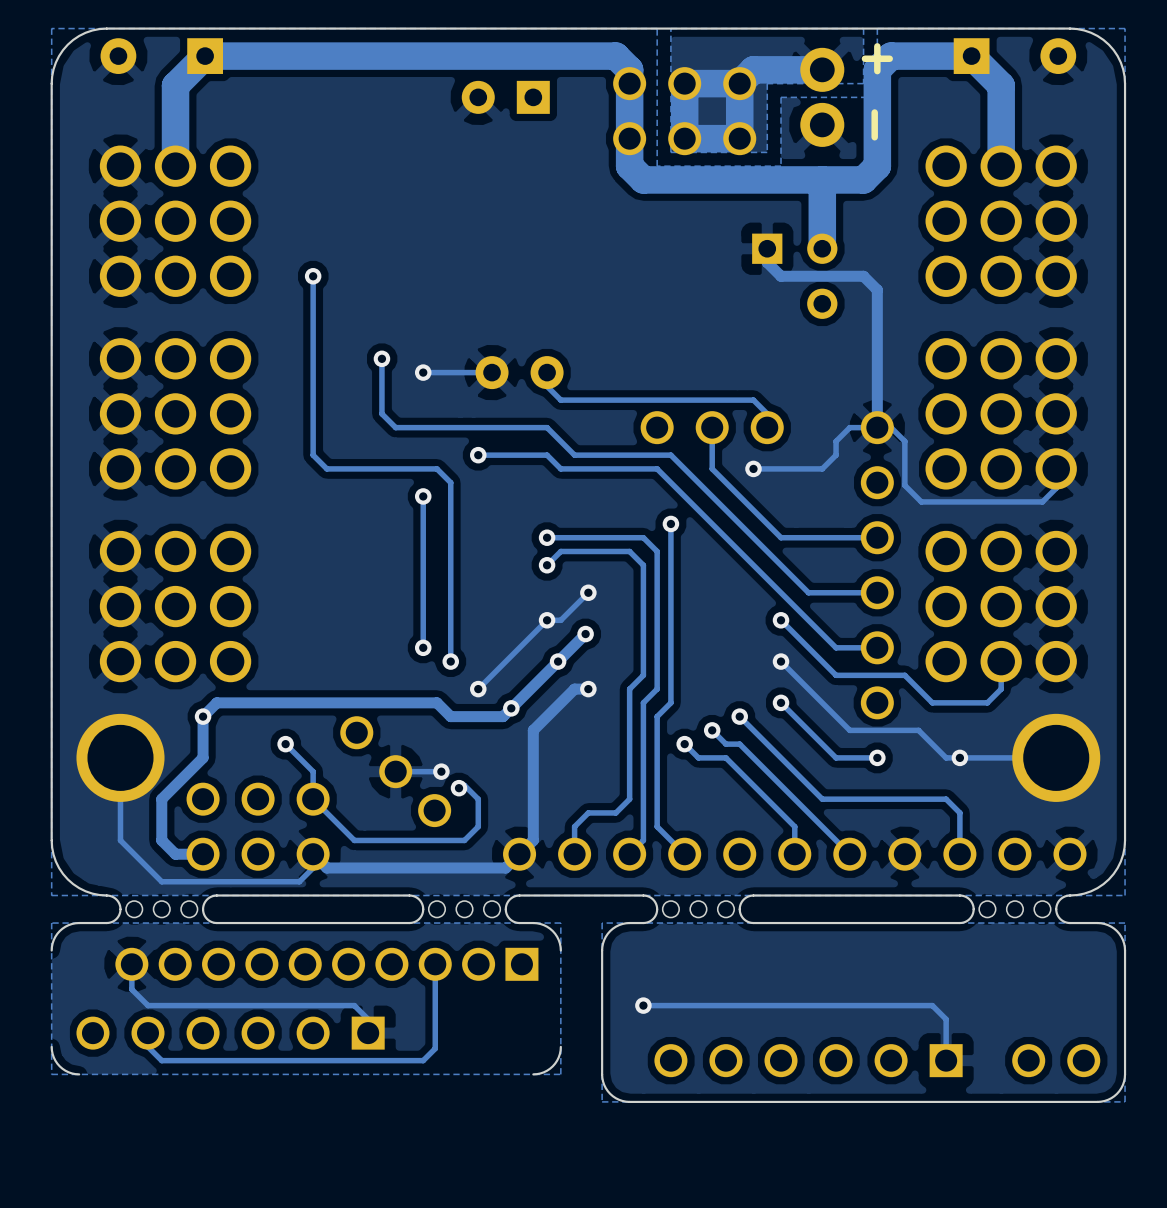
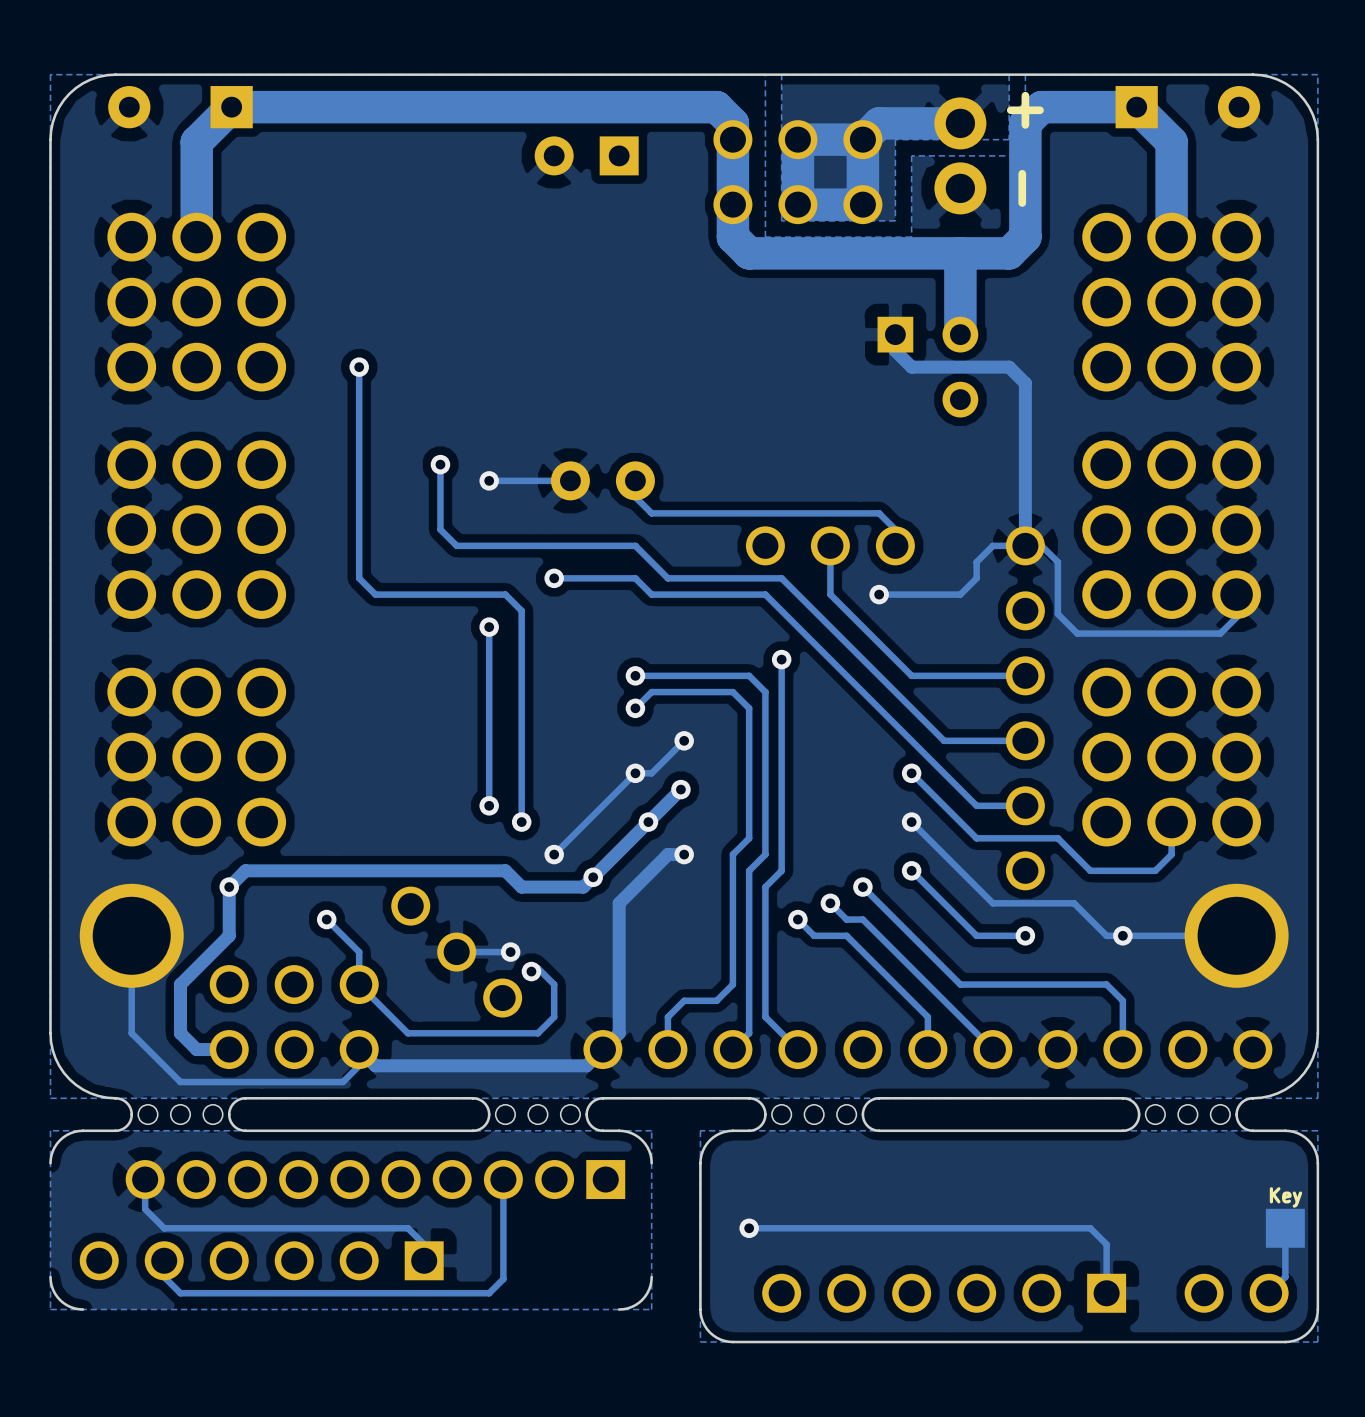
text: none -> Key (1285, 1197)
track: none -> (1285, 1228) (1285, 1277) (1269, 1293)
part: none -> (1285, 1228)

